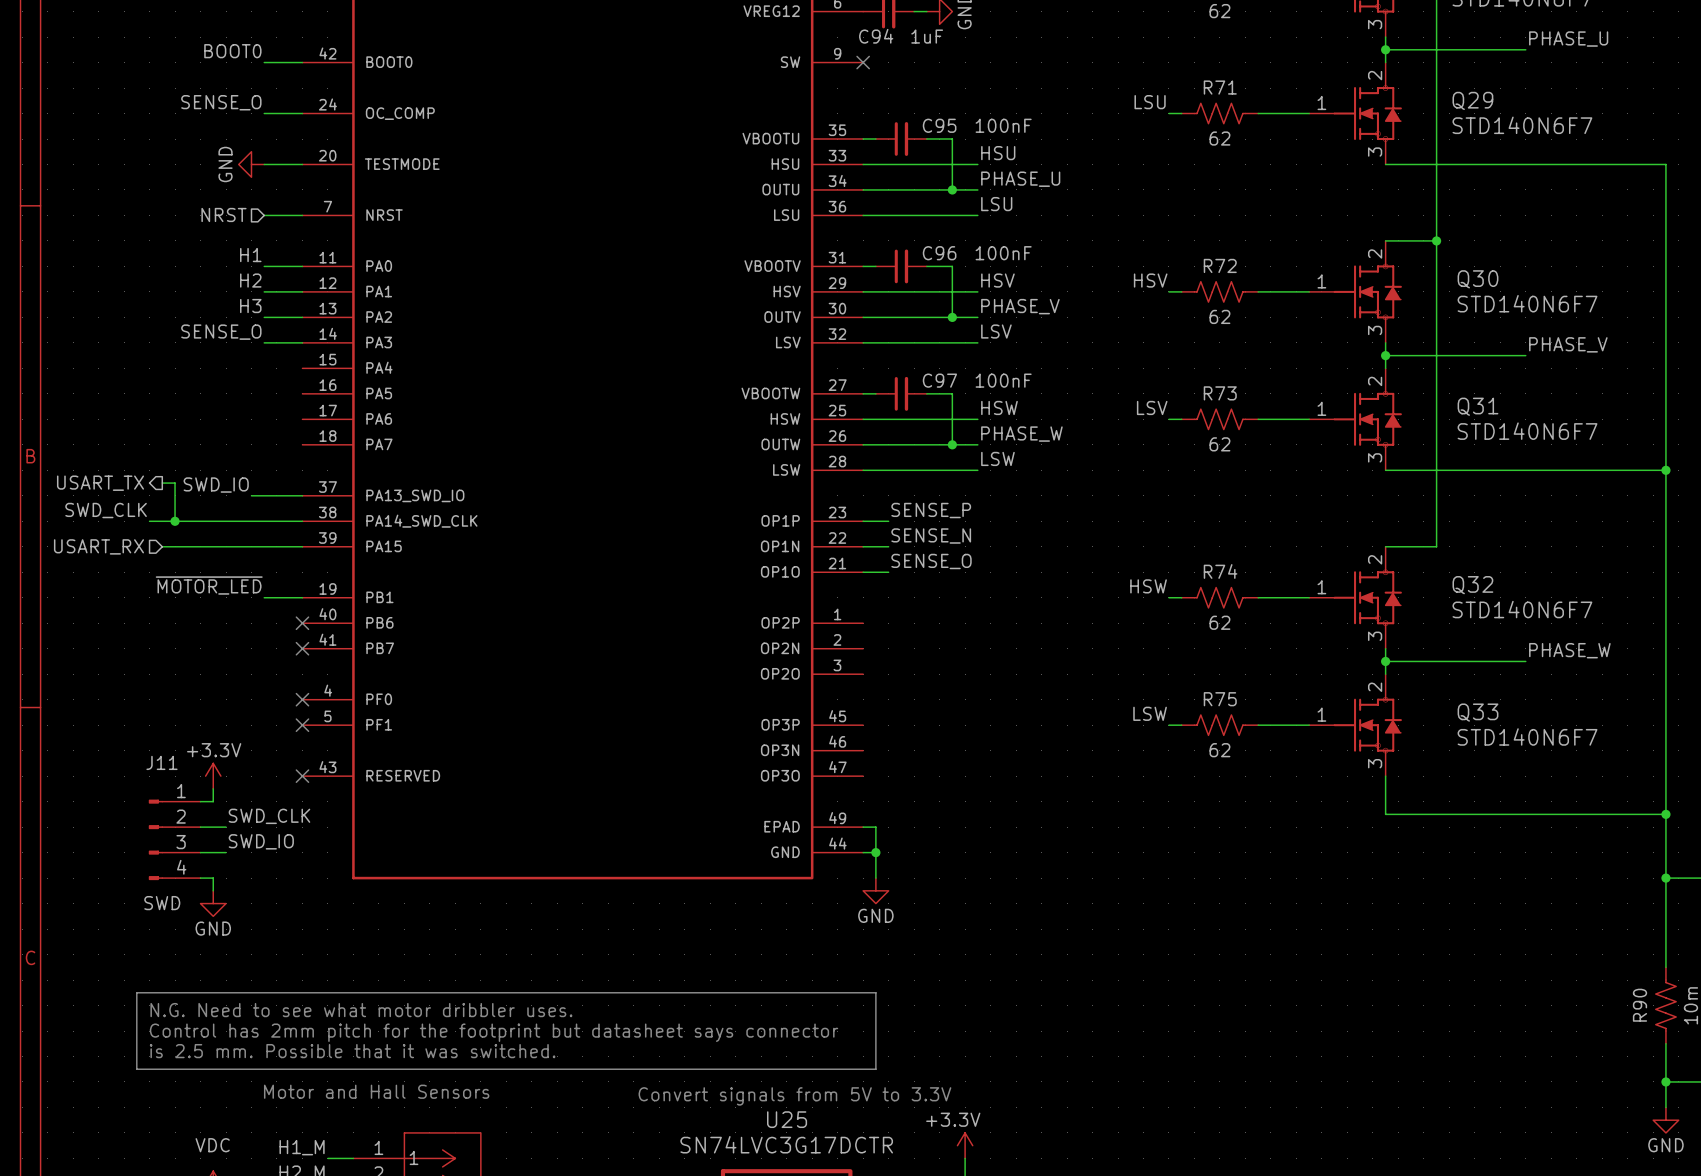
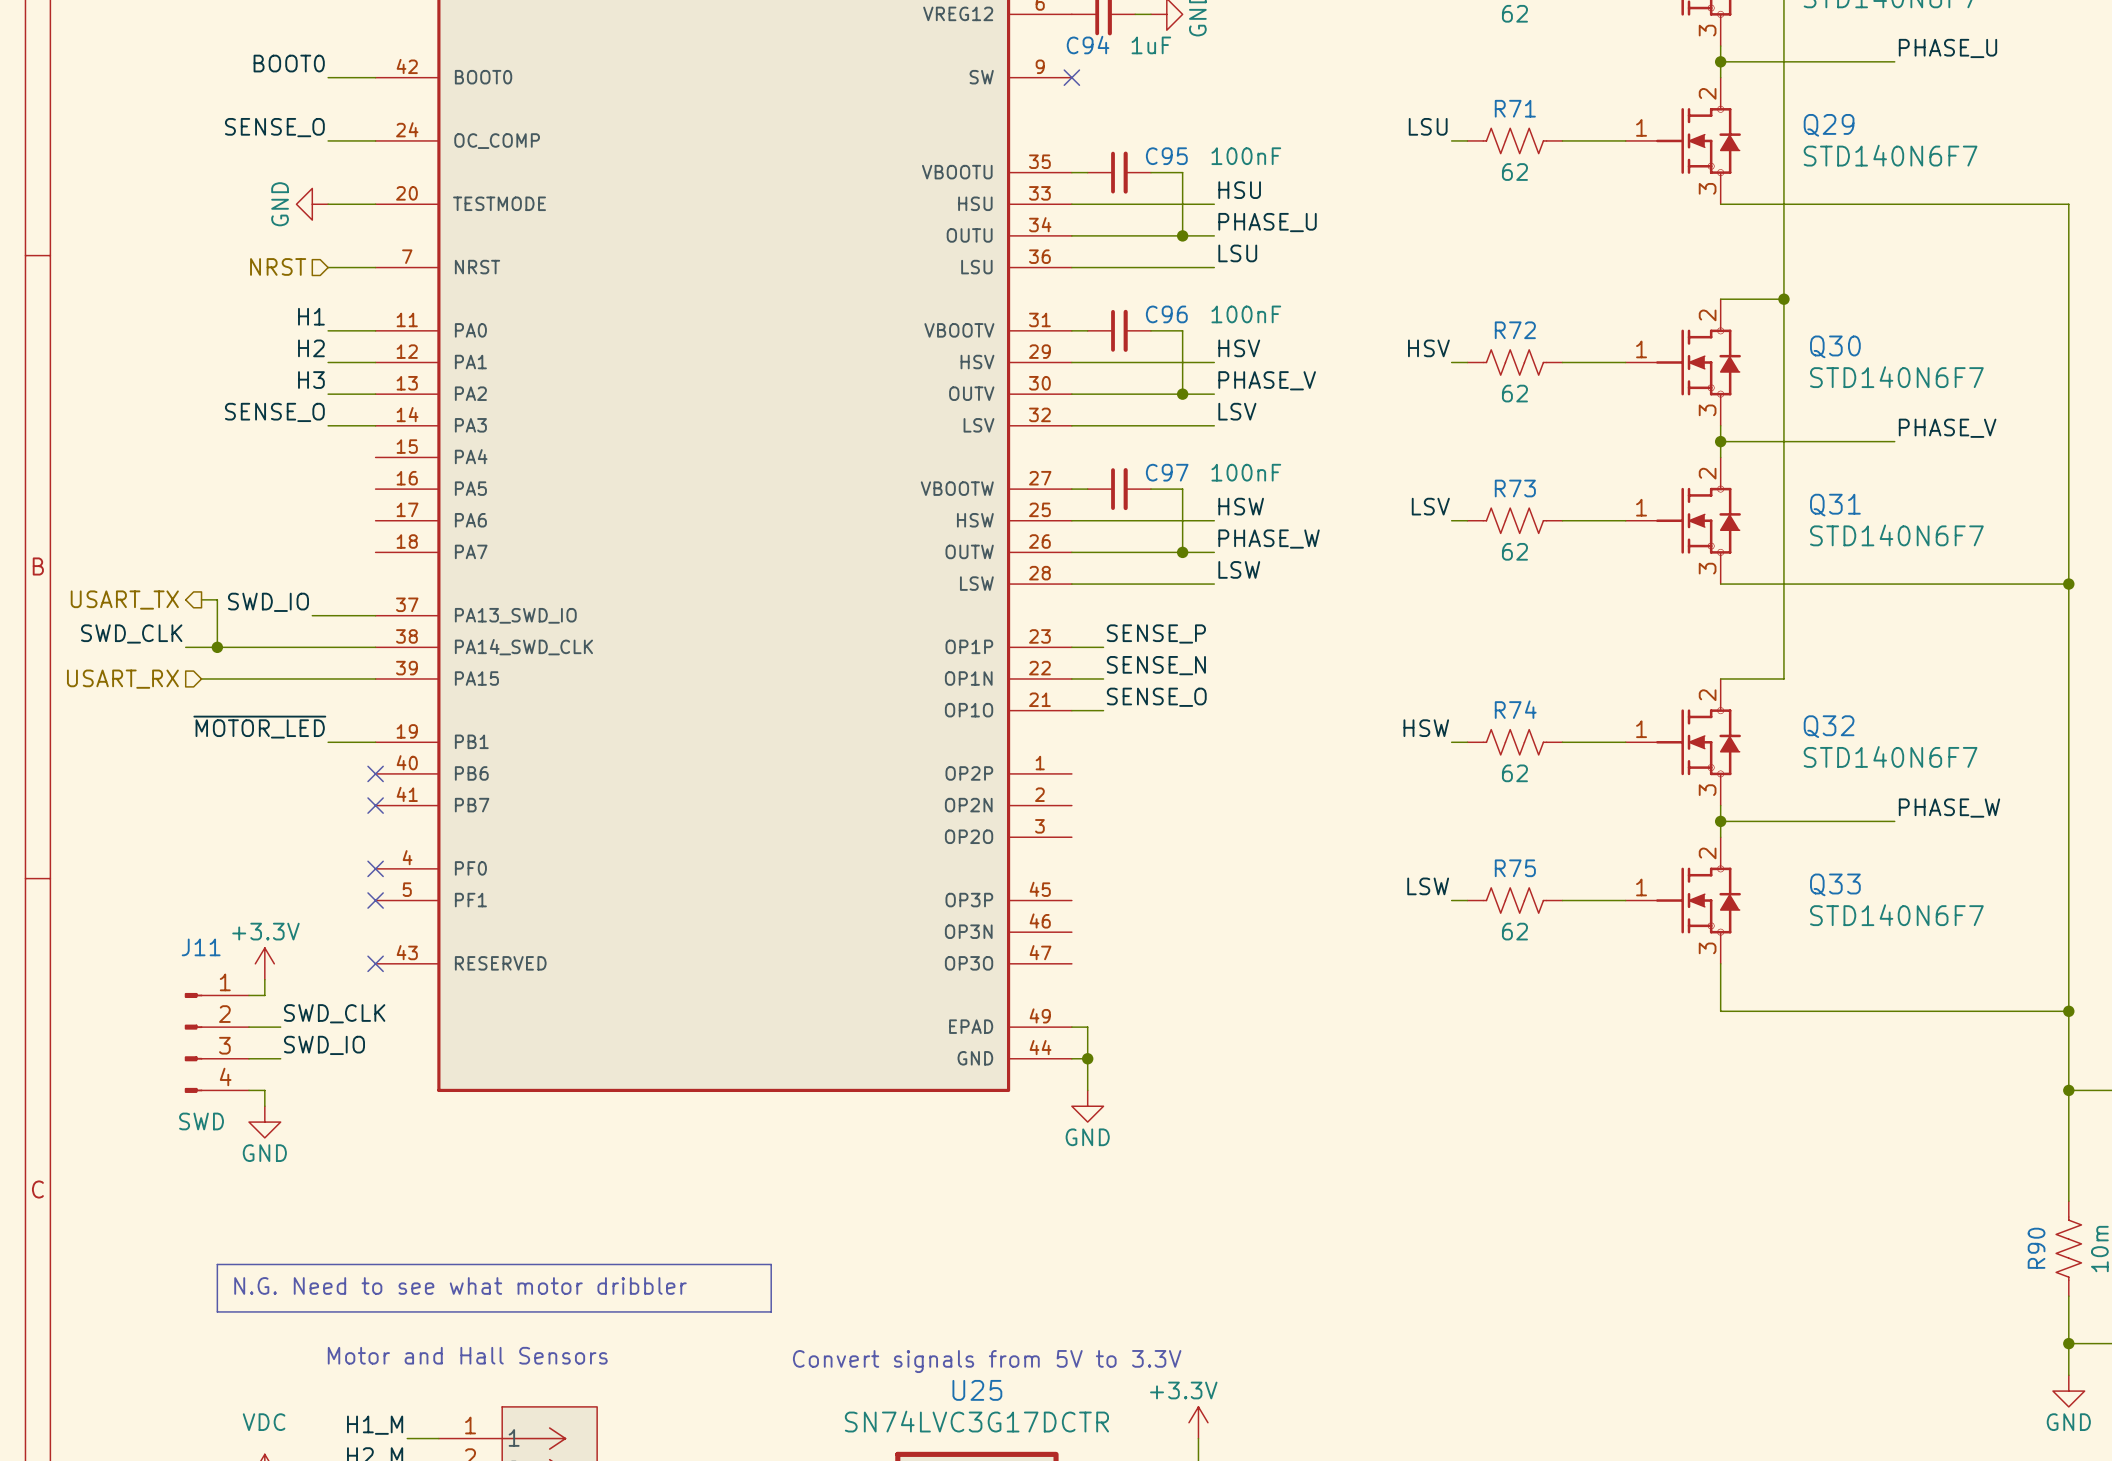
line: (136, 992) (875, 992) (875, 1069) (136, 1069) (136, 992) -> none
text: N.G. Need to see what motor dribbler uses. (361, 1010) -> N.G. Need to see what motor dribbler (460, 1285)
line: none -> (217, 1264) (771, 1264) (771, 1311) (217, 1311) (217, 1264)
text: Control has 2mm pitch for the footprint but datasheet says connector (494, 1032) -> none
text: is 2.5 mm. Possible that it was switched. (352, 1051) -> none

